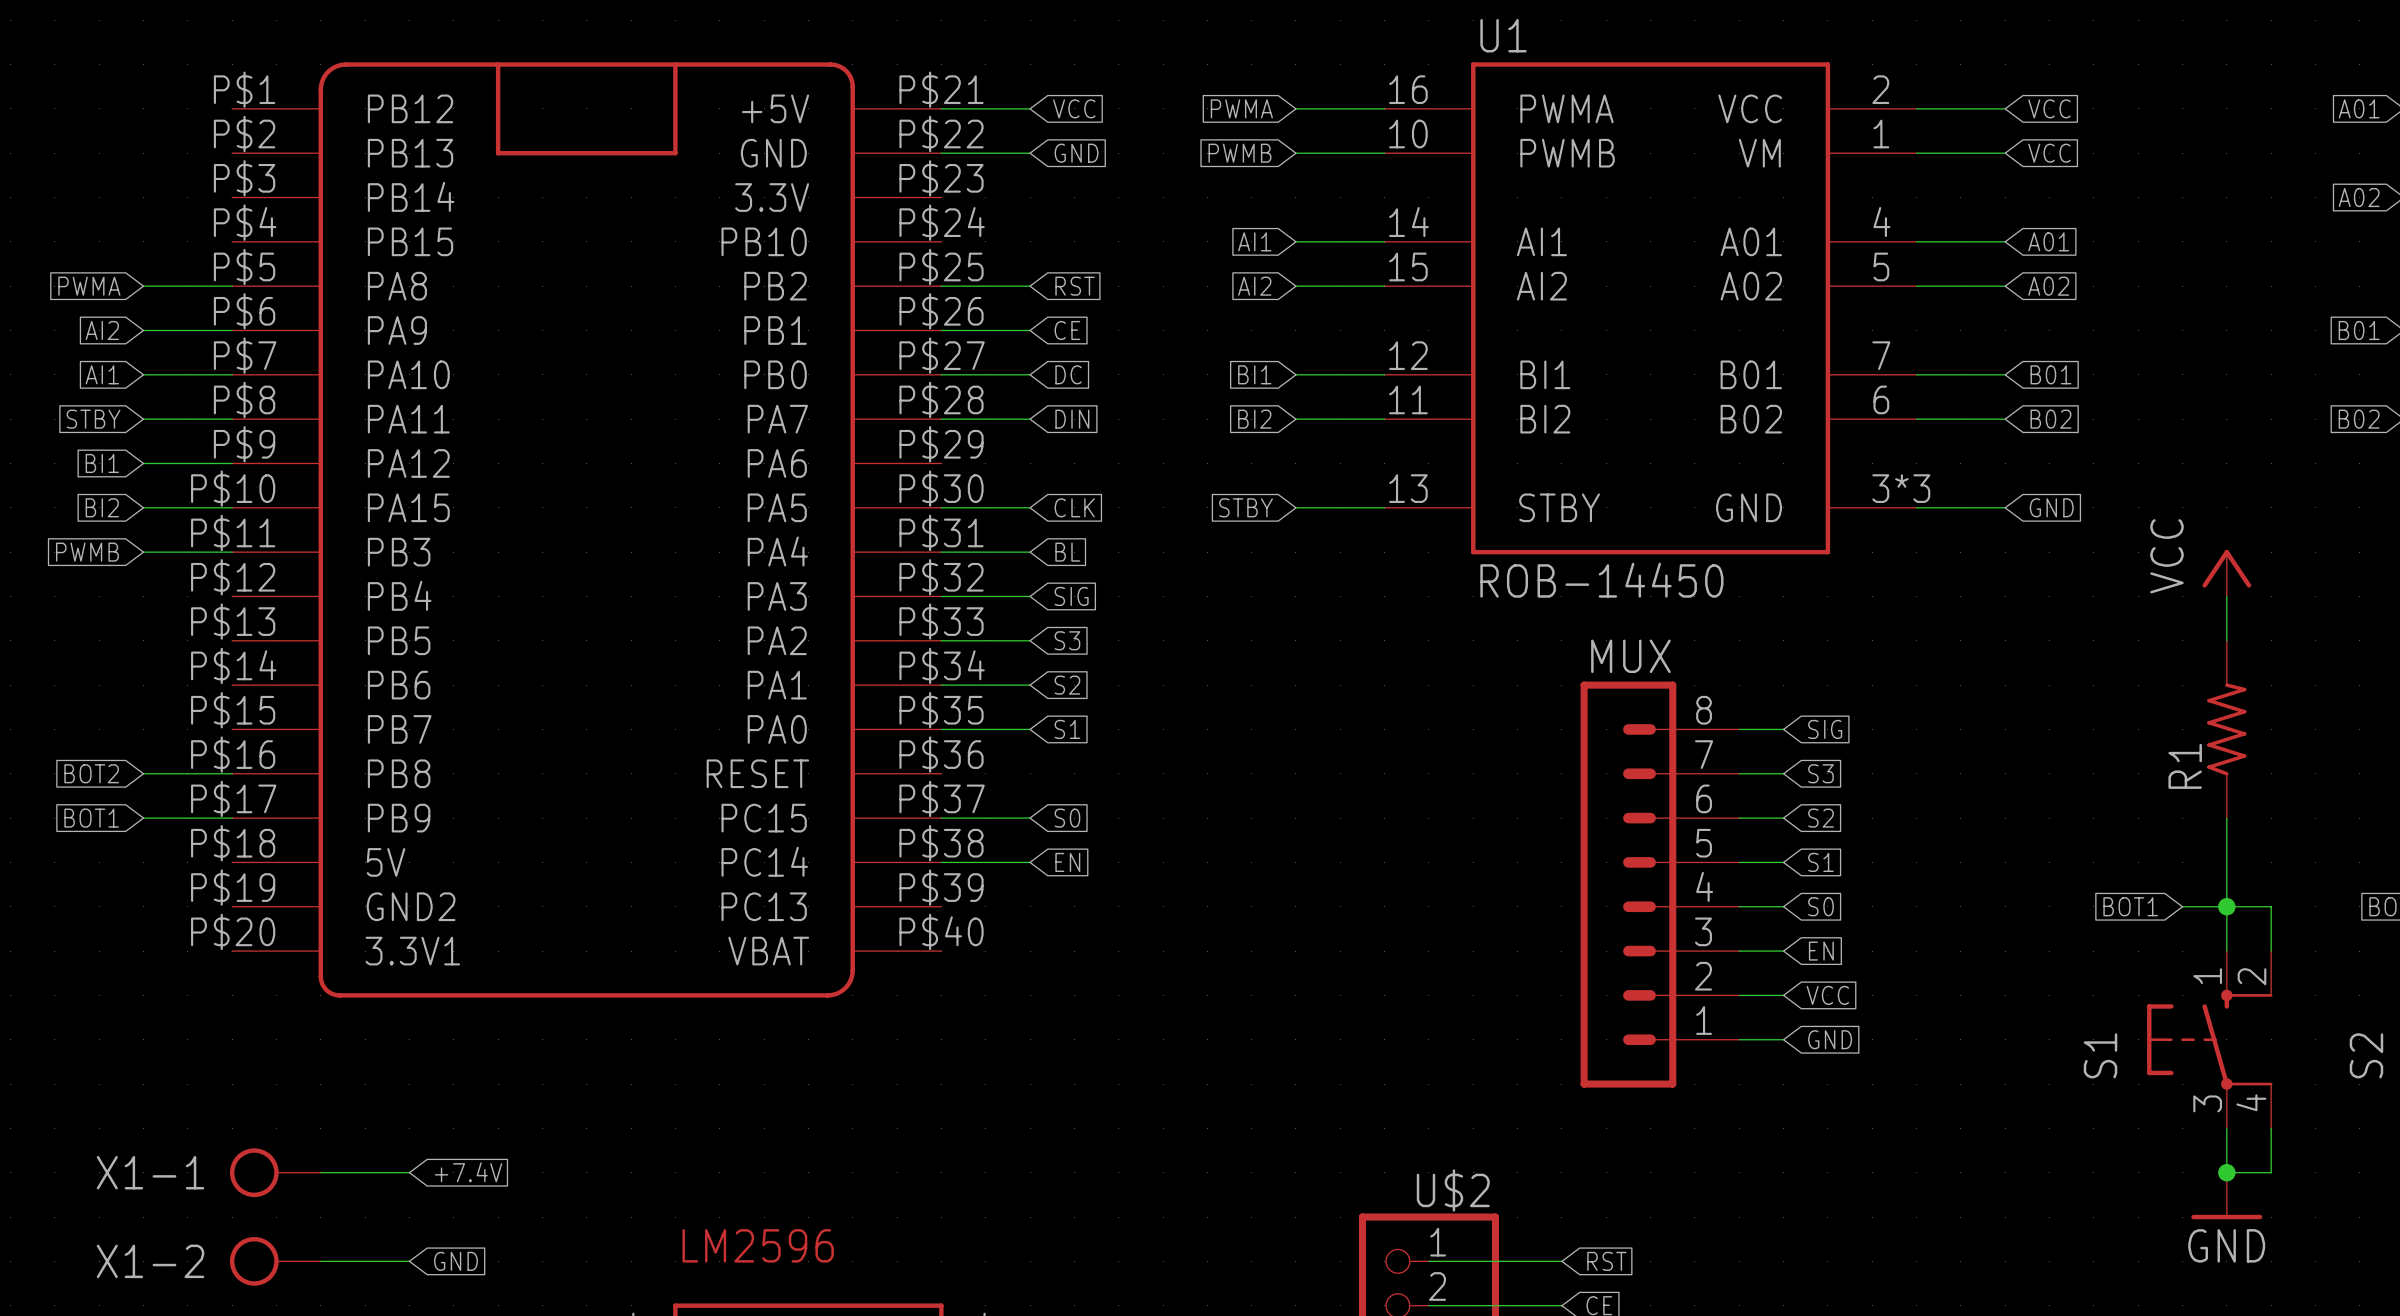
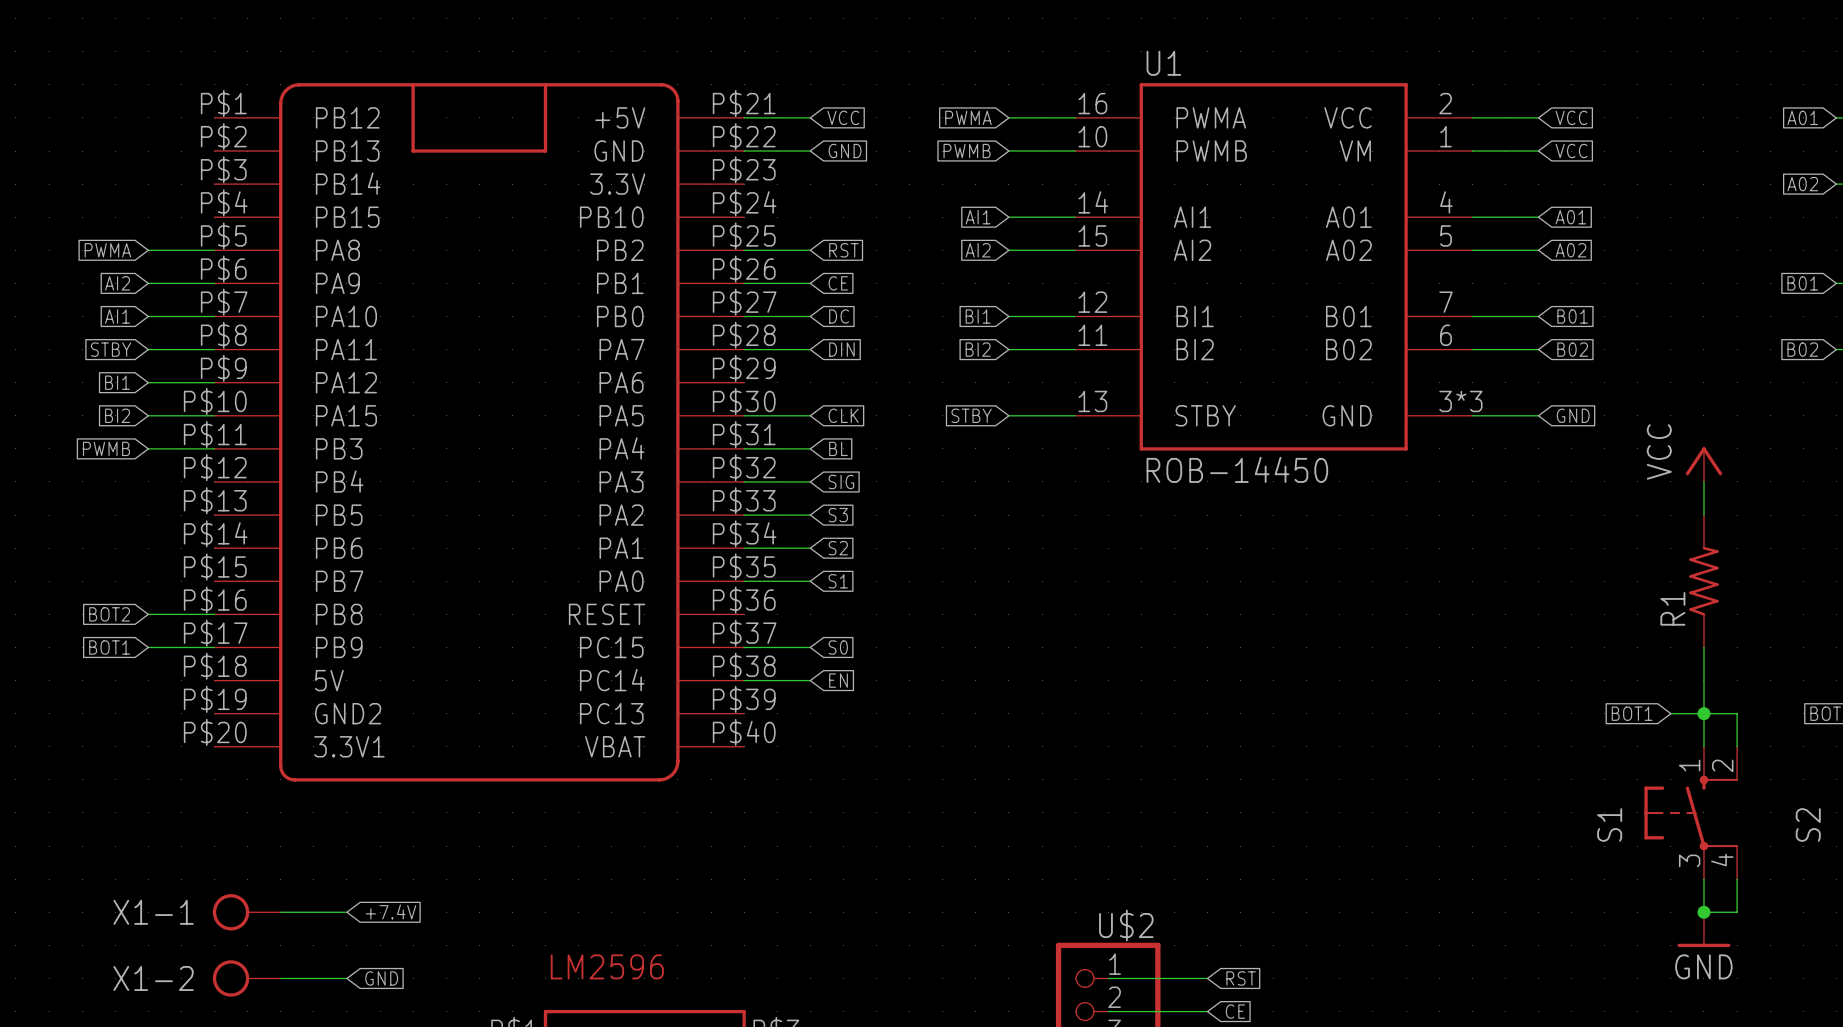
wire: (1739, 729) (1783, 729) -> none
global label: SIG (1825, 729) -> none
wire: (1739, 773) (1783, 773) -> none
global label: S3 (1820, 773) -> none
wire: (1739, 818) (1783, 818) -> none
global label: S2 (1820, 818) -> none
wire: (1739, 862) (1783, 862) -> none
global label: S1 (1820, 862) -> none
MUX: (1659, 884) -> none
wire: (1739, 906) (1783, 906) -> none
global label: S0 (1820, 906) -> none
wire: (1739, 951) (1783, 951) -> none
global label: EN (1821, 951) -> none
wire: (1739, 995) (1783, 995) -> none
global label: VCC (1827, 995) -> none
wire: (1739, 1039) (1783, 1039) -> none
global label: GND (1830, 1039) -> none

